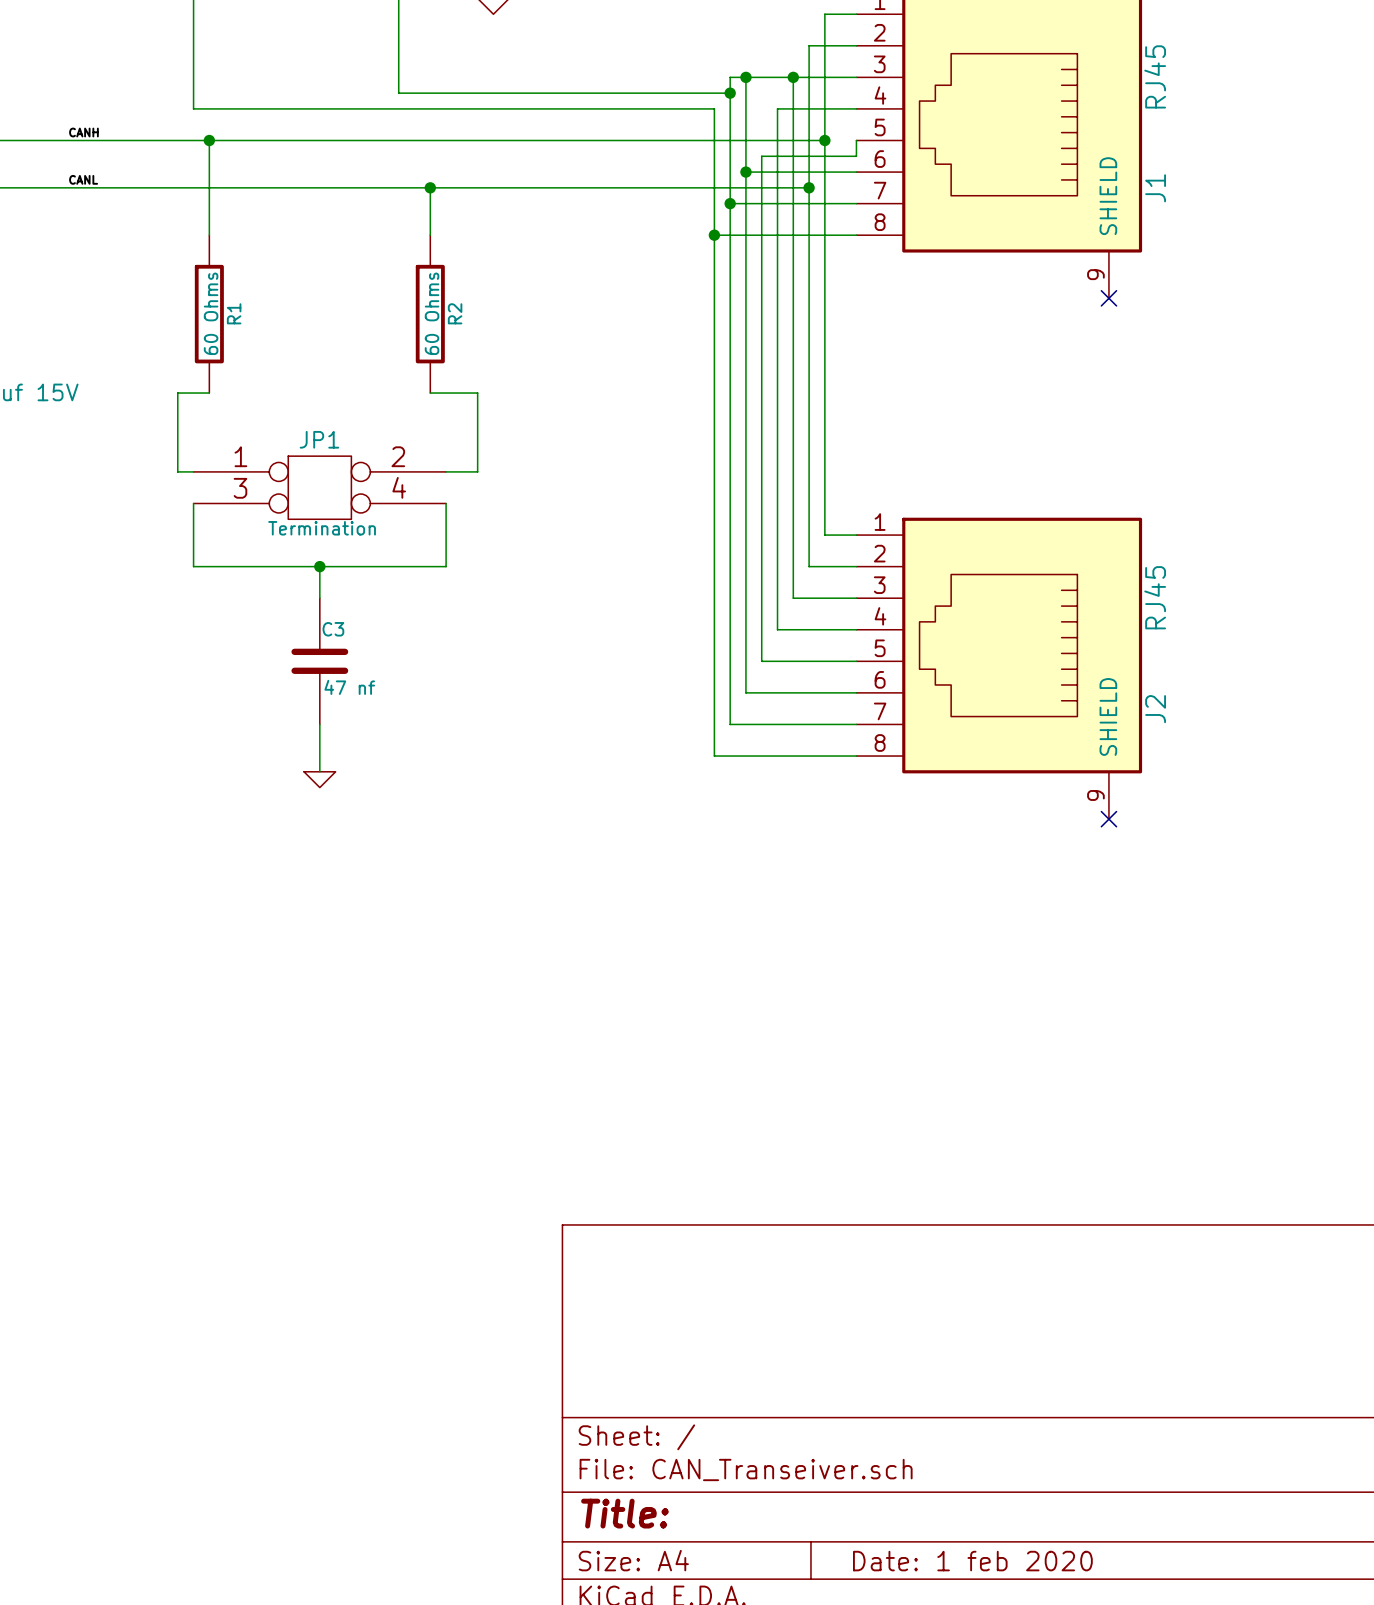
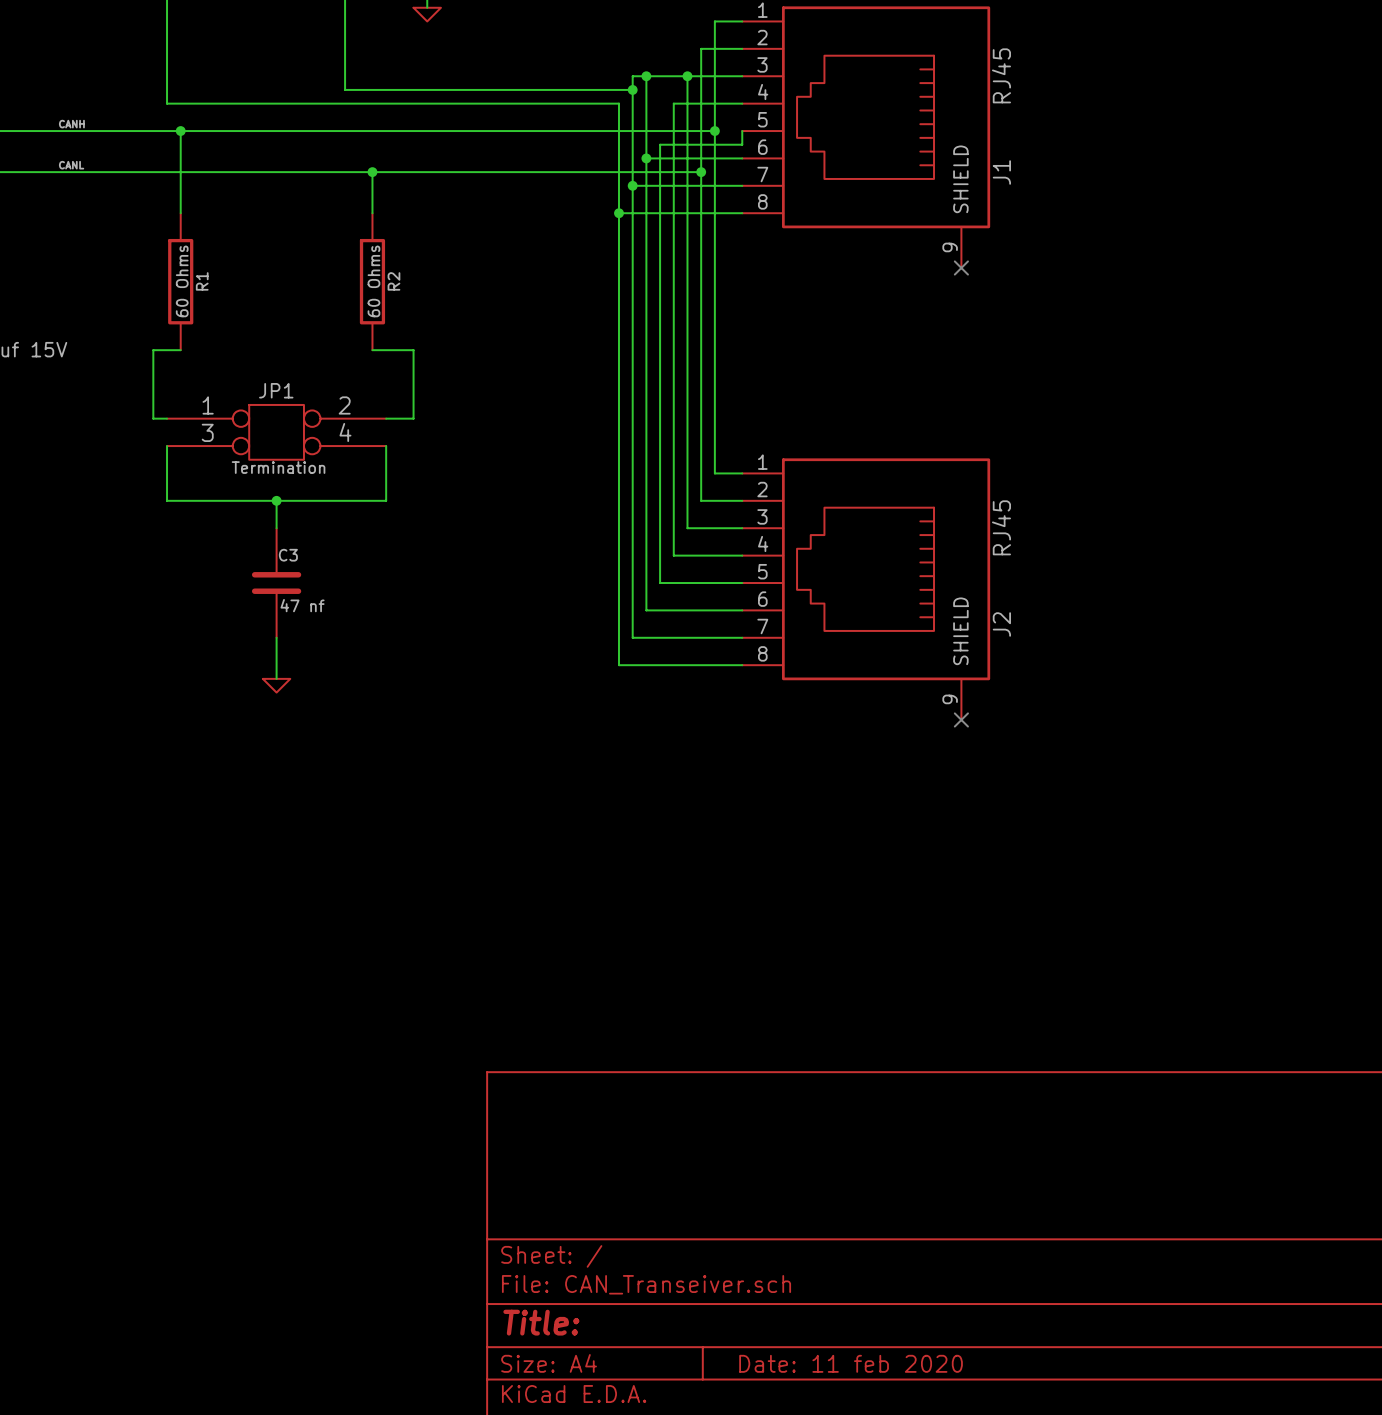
title block: Date: 1 feb 2020 (972, 1561) -> Date: 11 feb 2020 (851, 1363)

